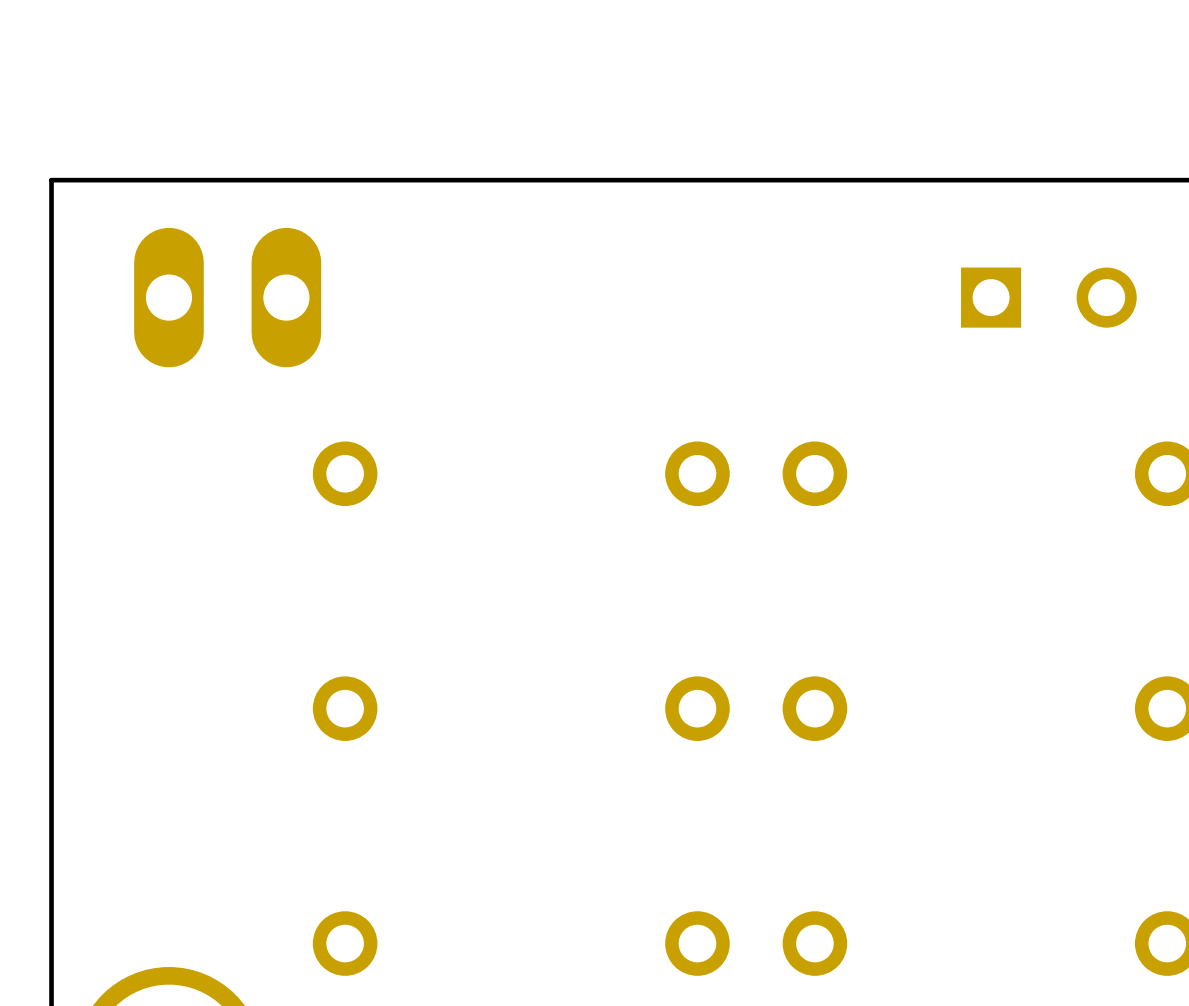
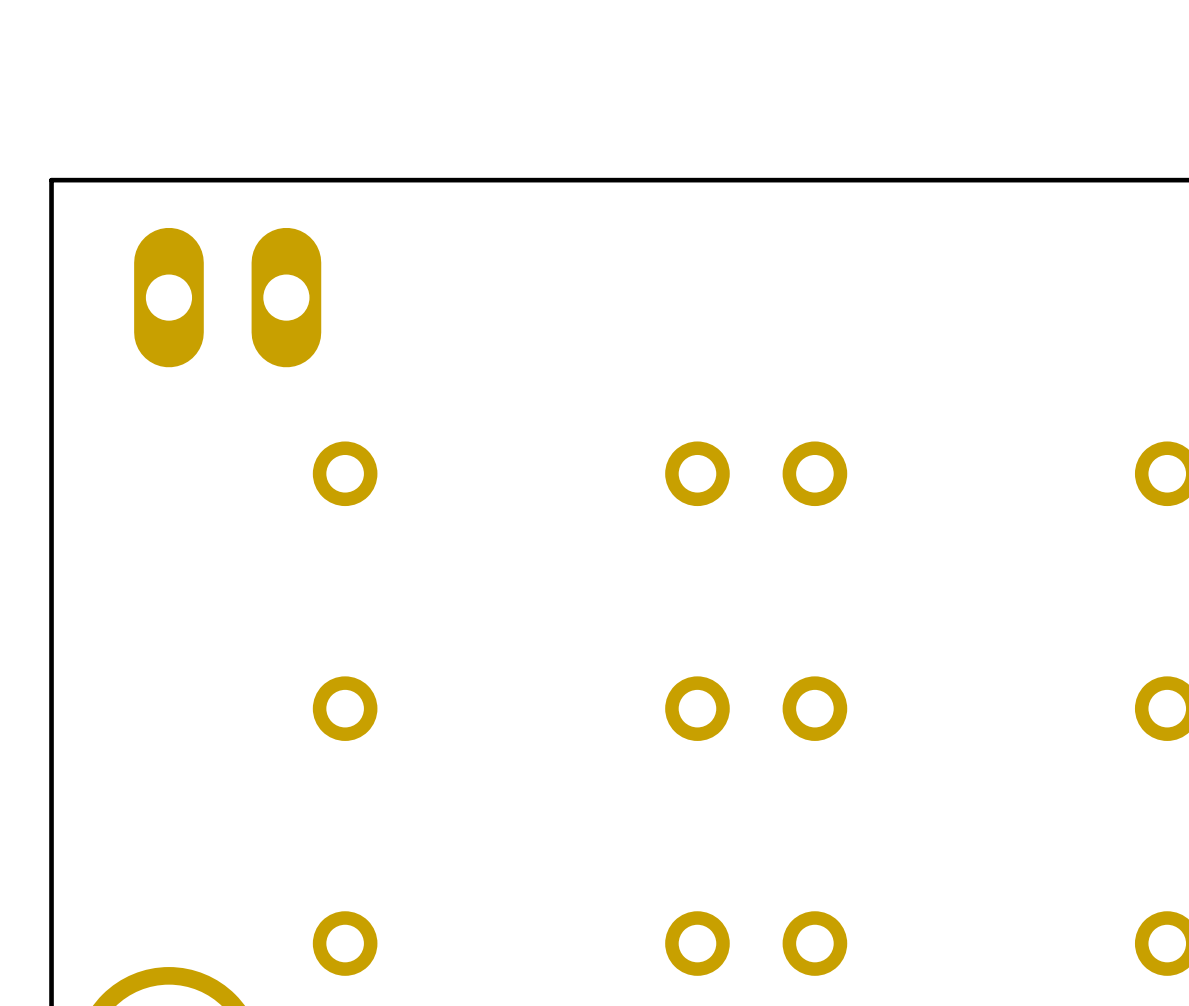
part: (1048, 297) -> none

